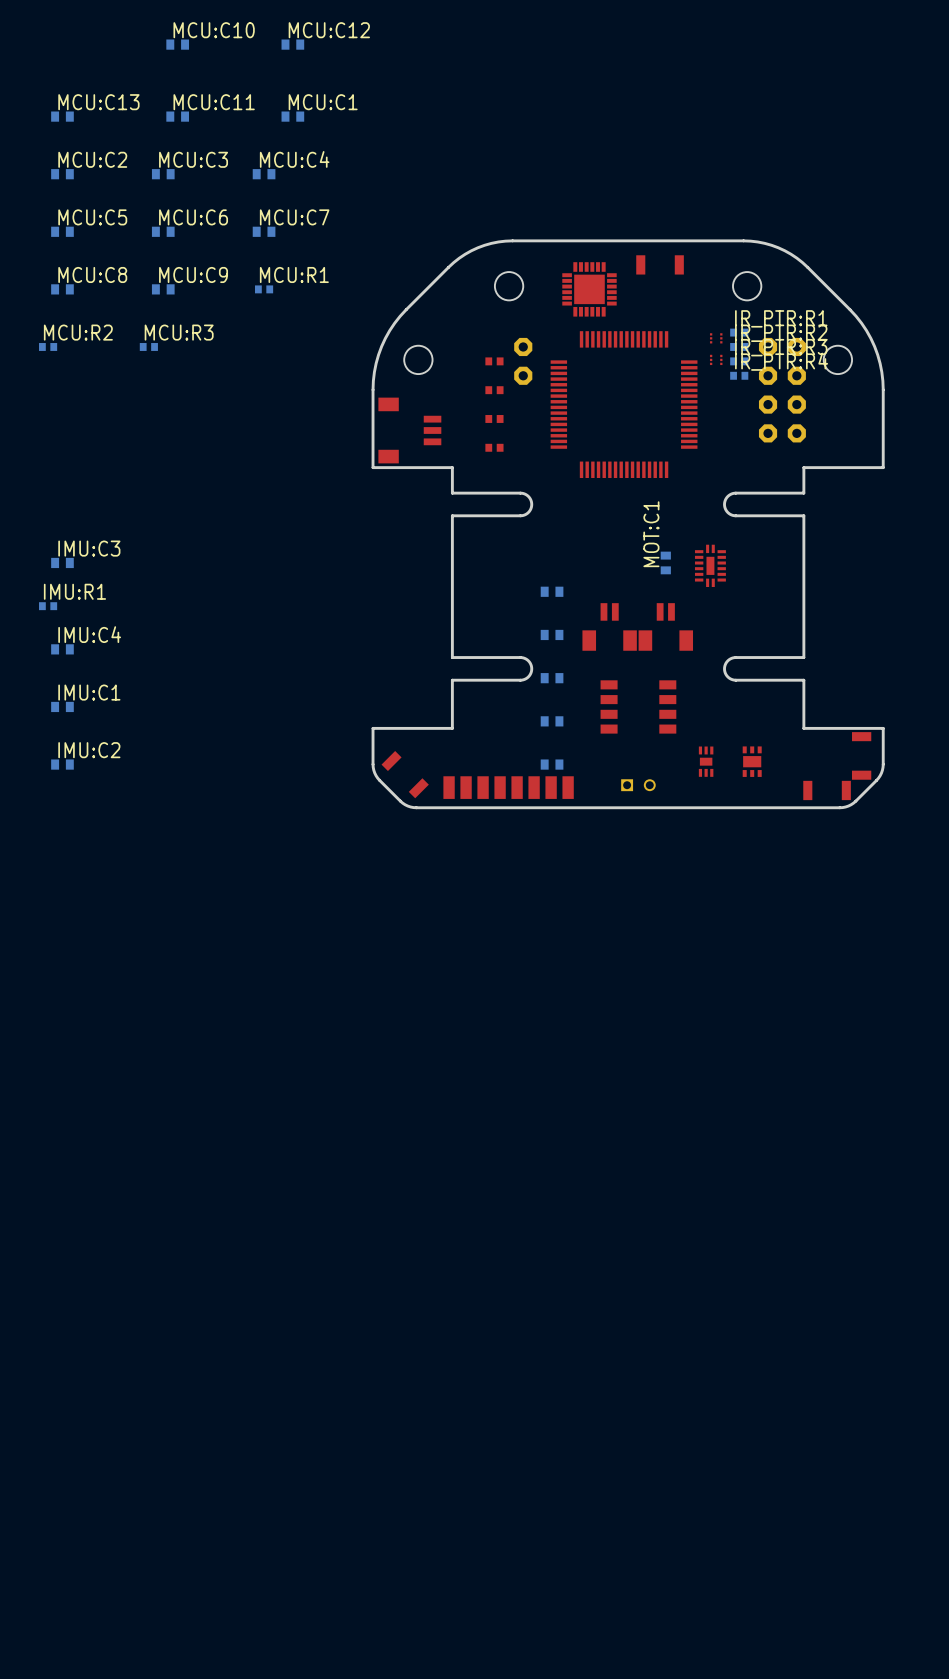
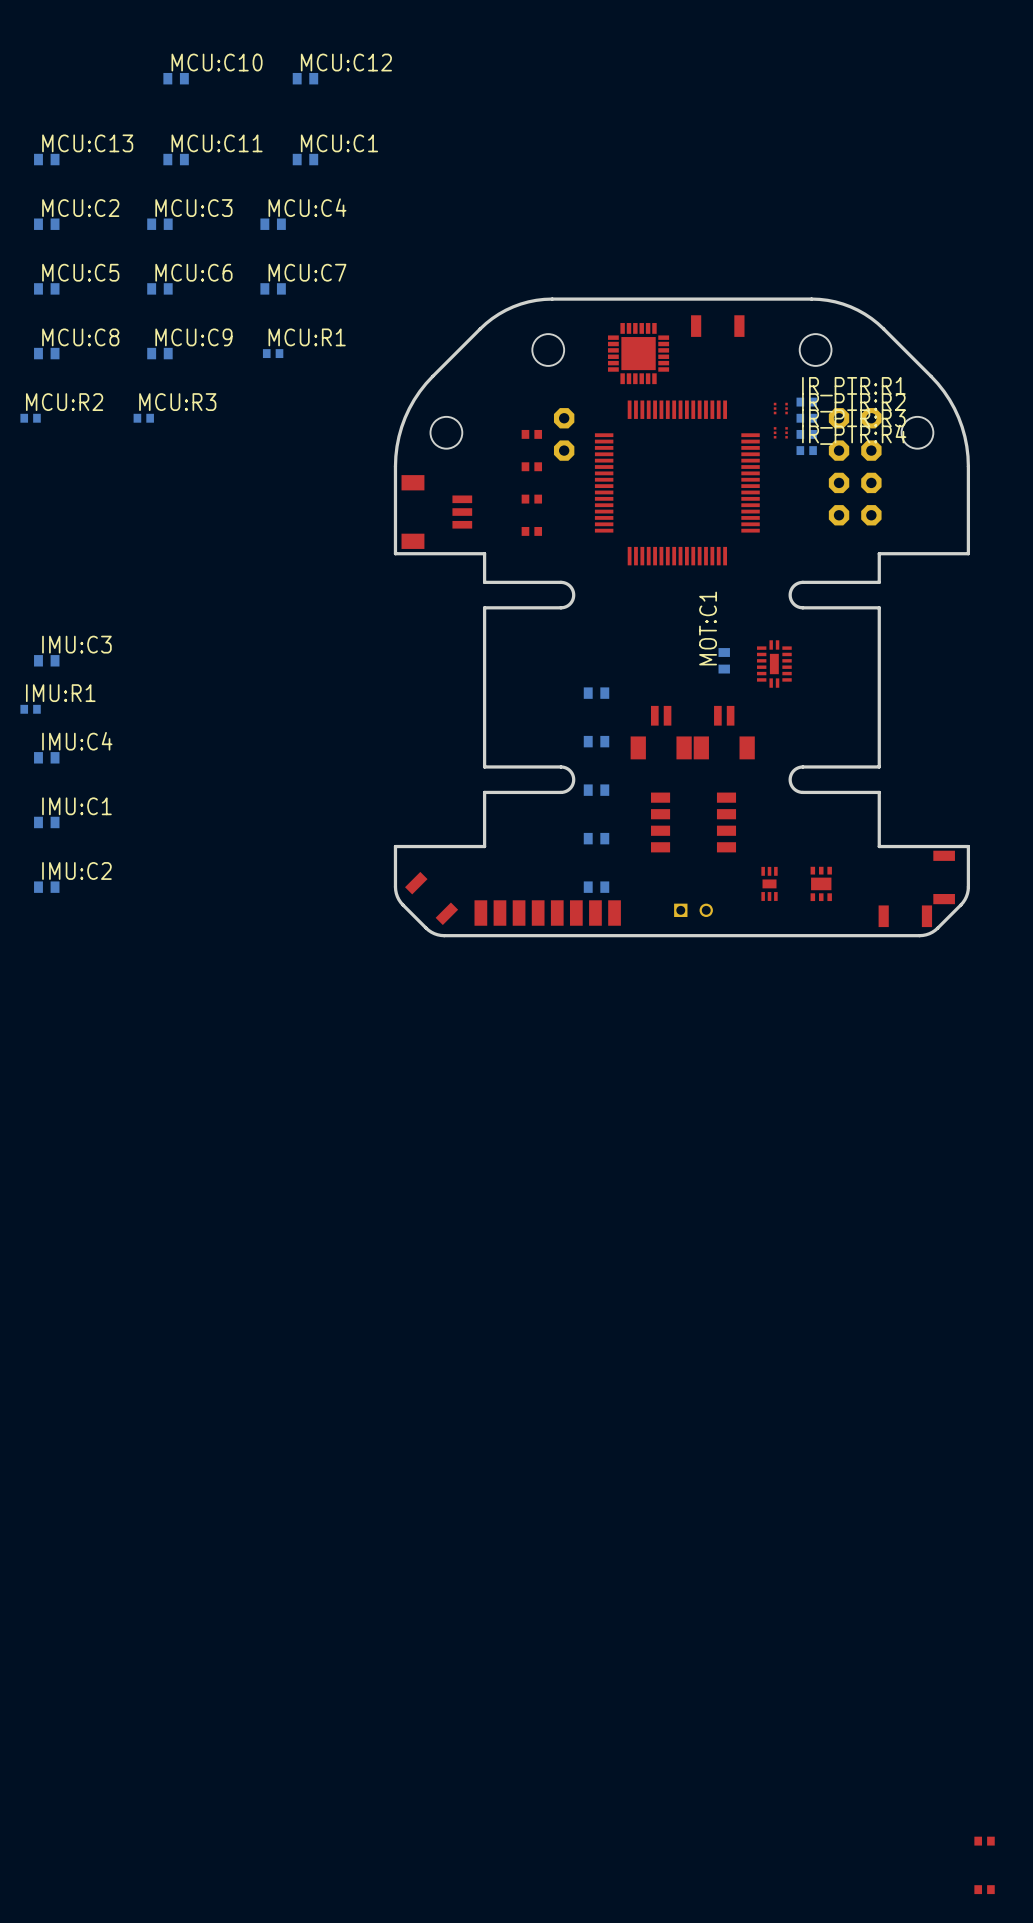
part: none -> (984, 1841)
part: none -> (984, 1889)

